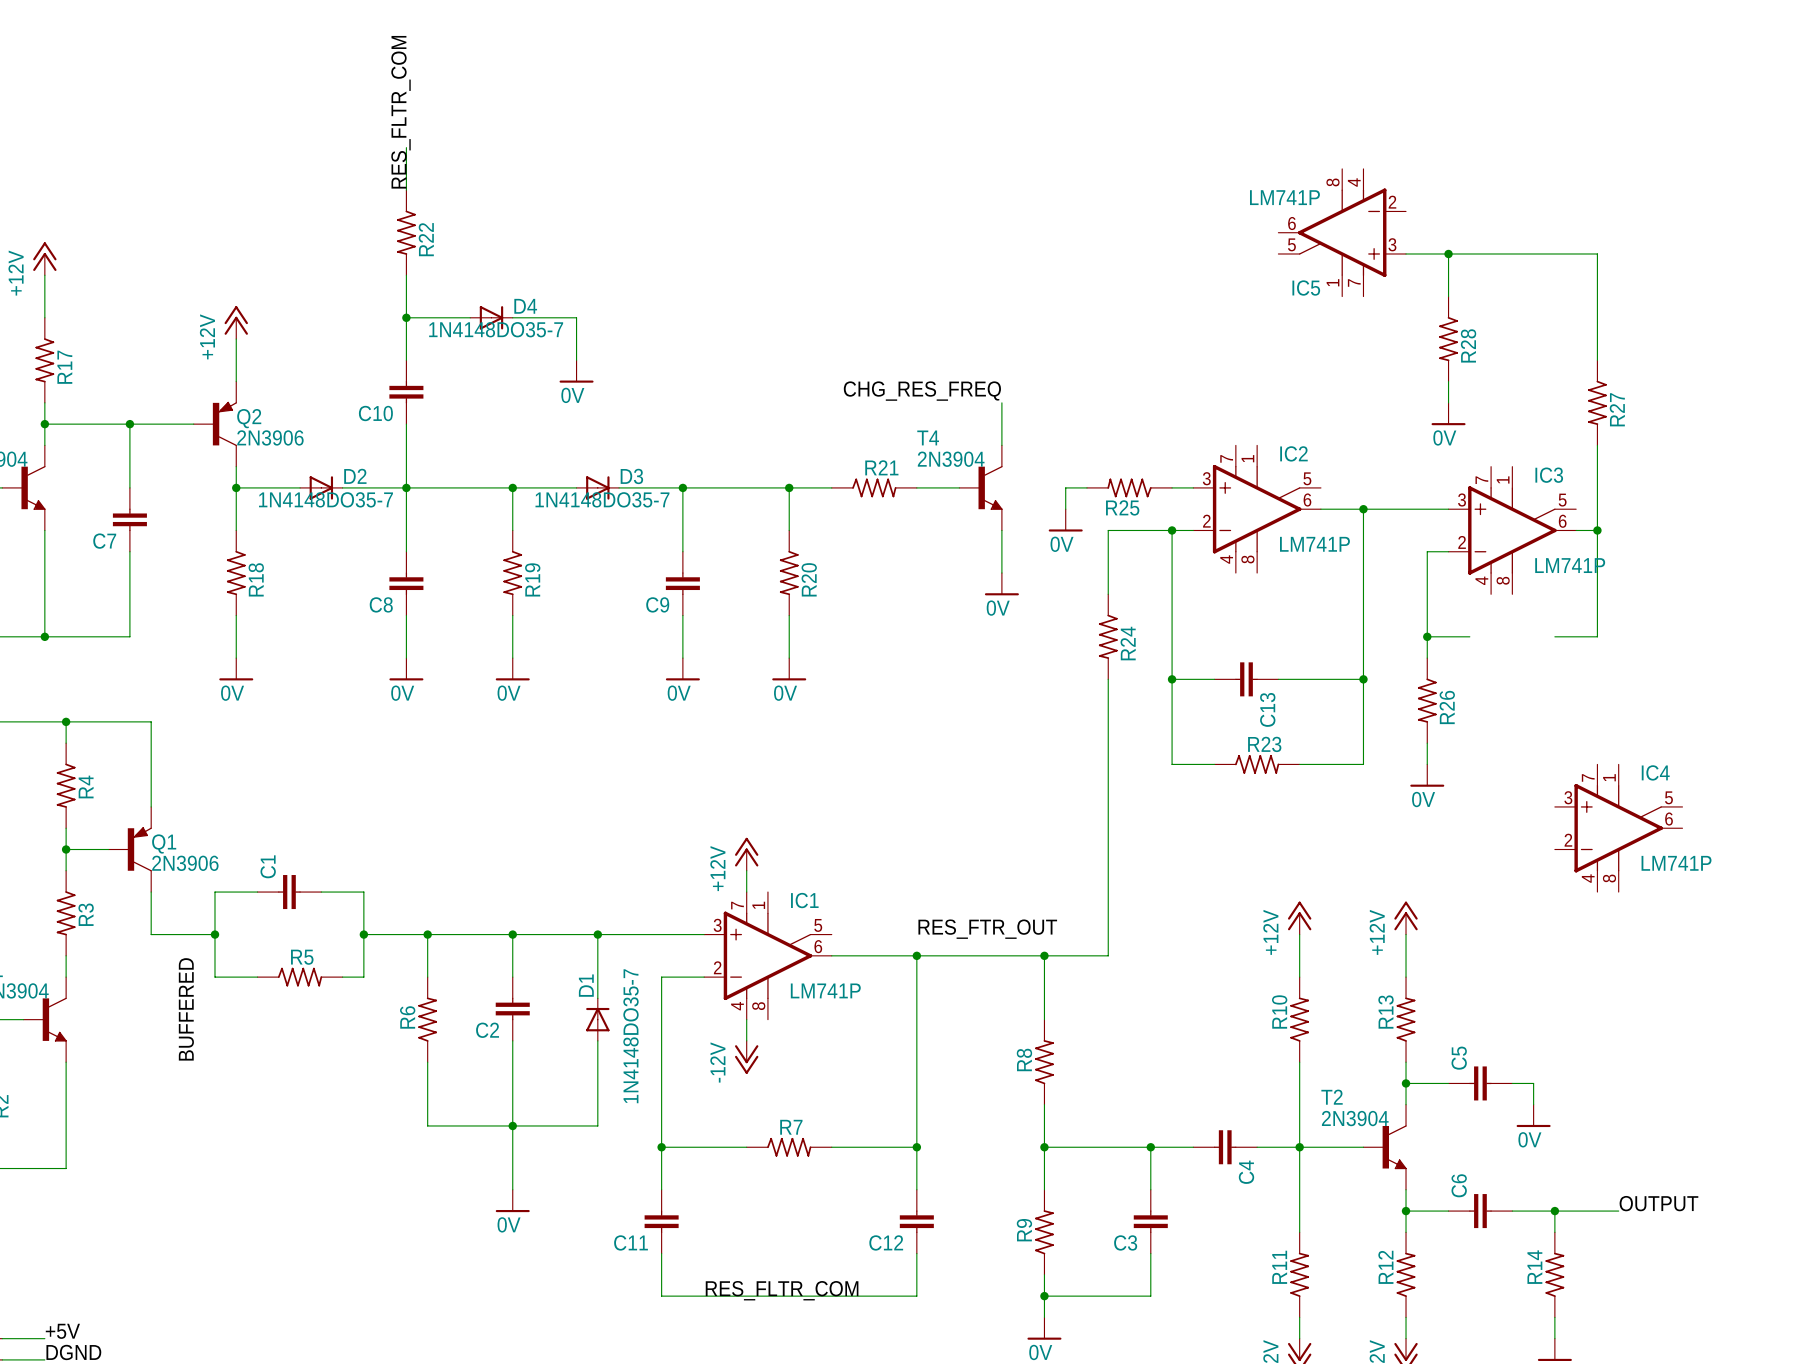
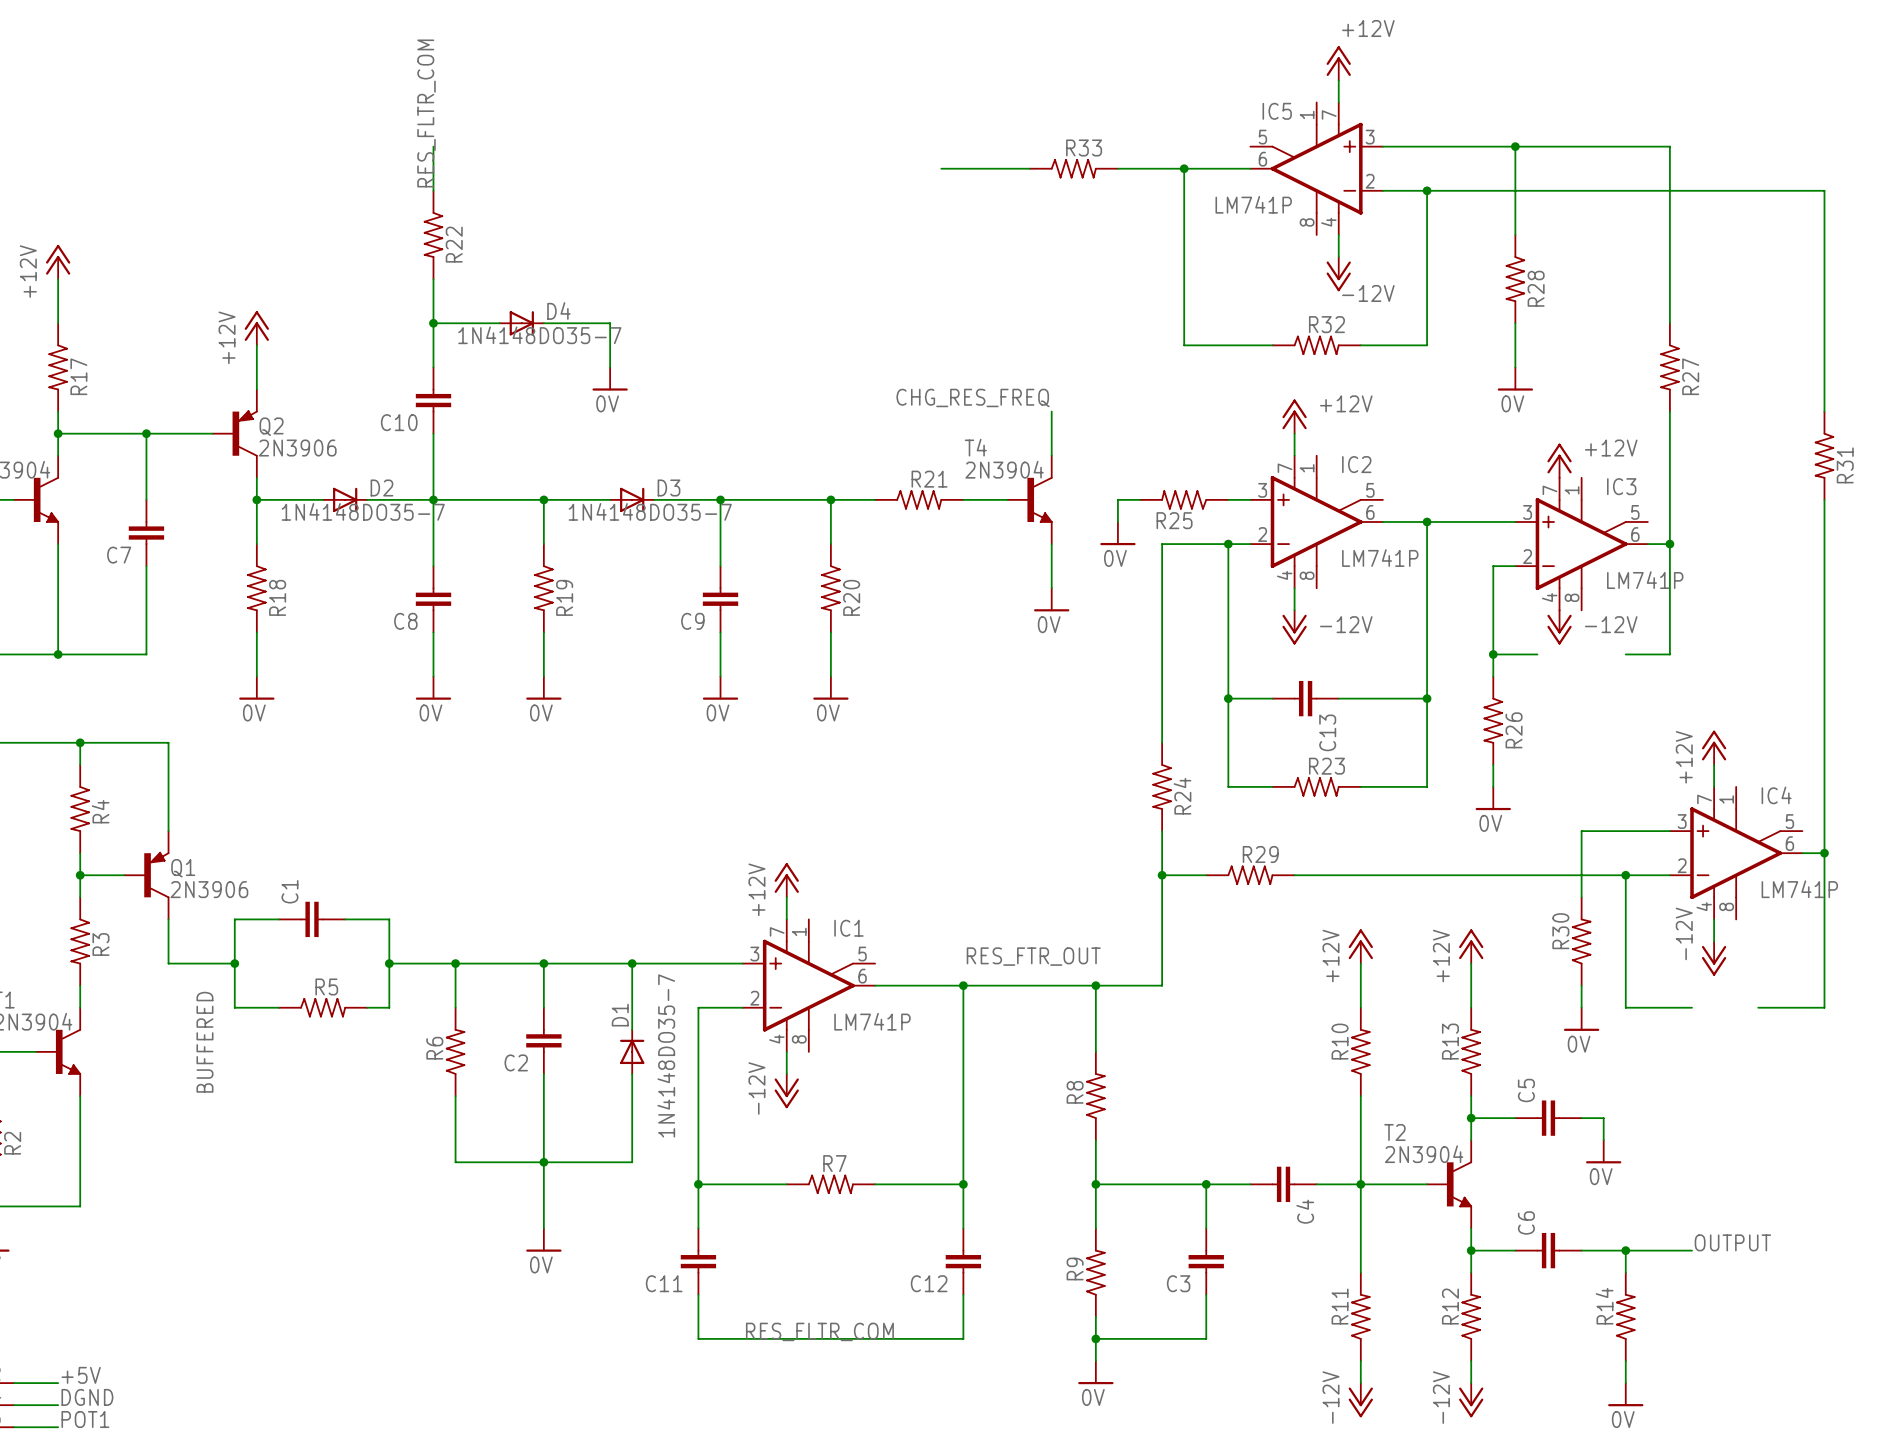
power symbol: none -> +12V (1338, 63)
wire: none -> (1338, 80) (1338, 102)
wire: none -> (1515, 146) (1515, 234)
junction: none -> (1515, 146)
wire: none -> (941, 168) (1029, 168)
R33: none -> (1073, 168)
wire: none -> (1117, 168) (1250, 168)
wire: none -> (1184, 168) (1184, 345) (1272, 345)
junction: none -> (1184, 168)
wire: none -> (1382, 190) (1824, 190) (1824, 411)
wire: none -> (1427, 190) (1427, 345) (1360, 345)
junction: none -> (1427, 190)
wire: none -> (1338, 234) (1338, 257)
IC5 flip: as is (1342, 232) -> up-down (1316, 168)
IC5 position: (1342, 232) -> (1316, 168)
wire: (1406, 253) (1597, 253) -> (1382, 146) (1669, 146) (1669, 257)
wire: (1448, 253) (1448, 296) -> (1515, 323) (1515, 367)
junction: (1448, 253) -> none
power symbol: none -> -12V (1338, 274)
R32: none -> (1316, 345)
R28 position: (1448, 339) -> (1515, 279)
wire: (1448, 381) (1448, 402) -> none
R27 position: (1597, 402) -> (1669, 367)
power symbol: none -> +12V (1294, 416)
power symbol position: 0V (1448, 414) -> 0V (1515, 379)
wire: none -> (1294, 433) (1294, 455)
R31: none -> (1824, 455)
power symbol: none -> +12V (1559, 460)
wire: none -> (1824, 499) (1824, 1007) (1758, 1007)
wire: none -> (1294, 588) (1294, 610)
power symbol: none -> -12V (1294, 627)
power symbol: none -> -12V (1559, 627)
R24 position: (1108, 636) -> (1162, 786)
power symbol: none -> +12V (1714, 747)
wire: none -> (1714, 764) (1714, 786)
wire: none -> (1669, 831) (1581, 831) (1581, 897)
IC4 position: (1618, 828) -> (1736, 853)
wire: none -> (1802, 853) (1824, 853)
junction: none -> (1824, 853)
wire: none -> (1162, 875) (1206, 875)
junction: none -> (1162, 875)
R29: none -> (1250, 875)
wire: none -> (1294, 875) (1669, 875)
wire: none -> (1625, 875) (1625, 1007) (1692, 1007)
junction: none -> (1625, 875)
wire: none -> (1714, 919) (1714, 941)
R30: none -> (1581, 941)
power symbol: none -> -12V (1714, 958)
wire: none -> (1581, 985) (1581, 1007)
power symbol: none -> 0V (1581, 1019)

